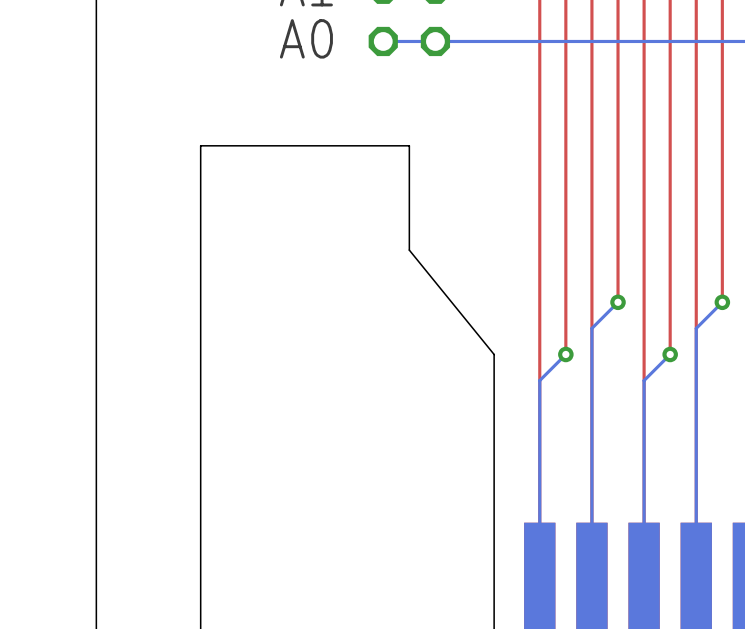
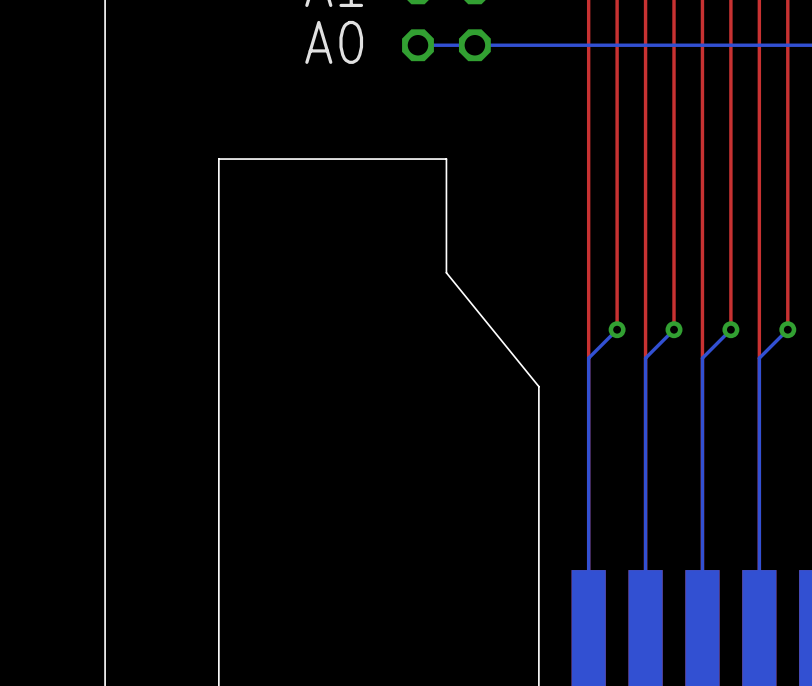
top track: (565, 302) (565, 354) -> none
top track: (670, 302) (670, 354) -> none
bottom track: (565, 354) (539, 380) -> (617, 329) (588, 358) (588, 415)
via position: (565, 354) -> (617, 329)
bottom track: (670, 354) (644, 380) -> (730, 329) (702, 358) (702, 415)
via position: (670, 354) -> (730, 329)

